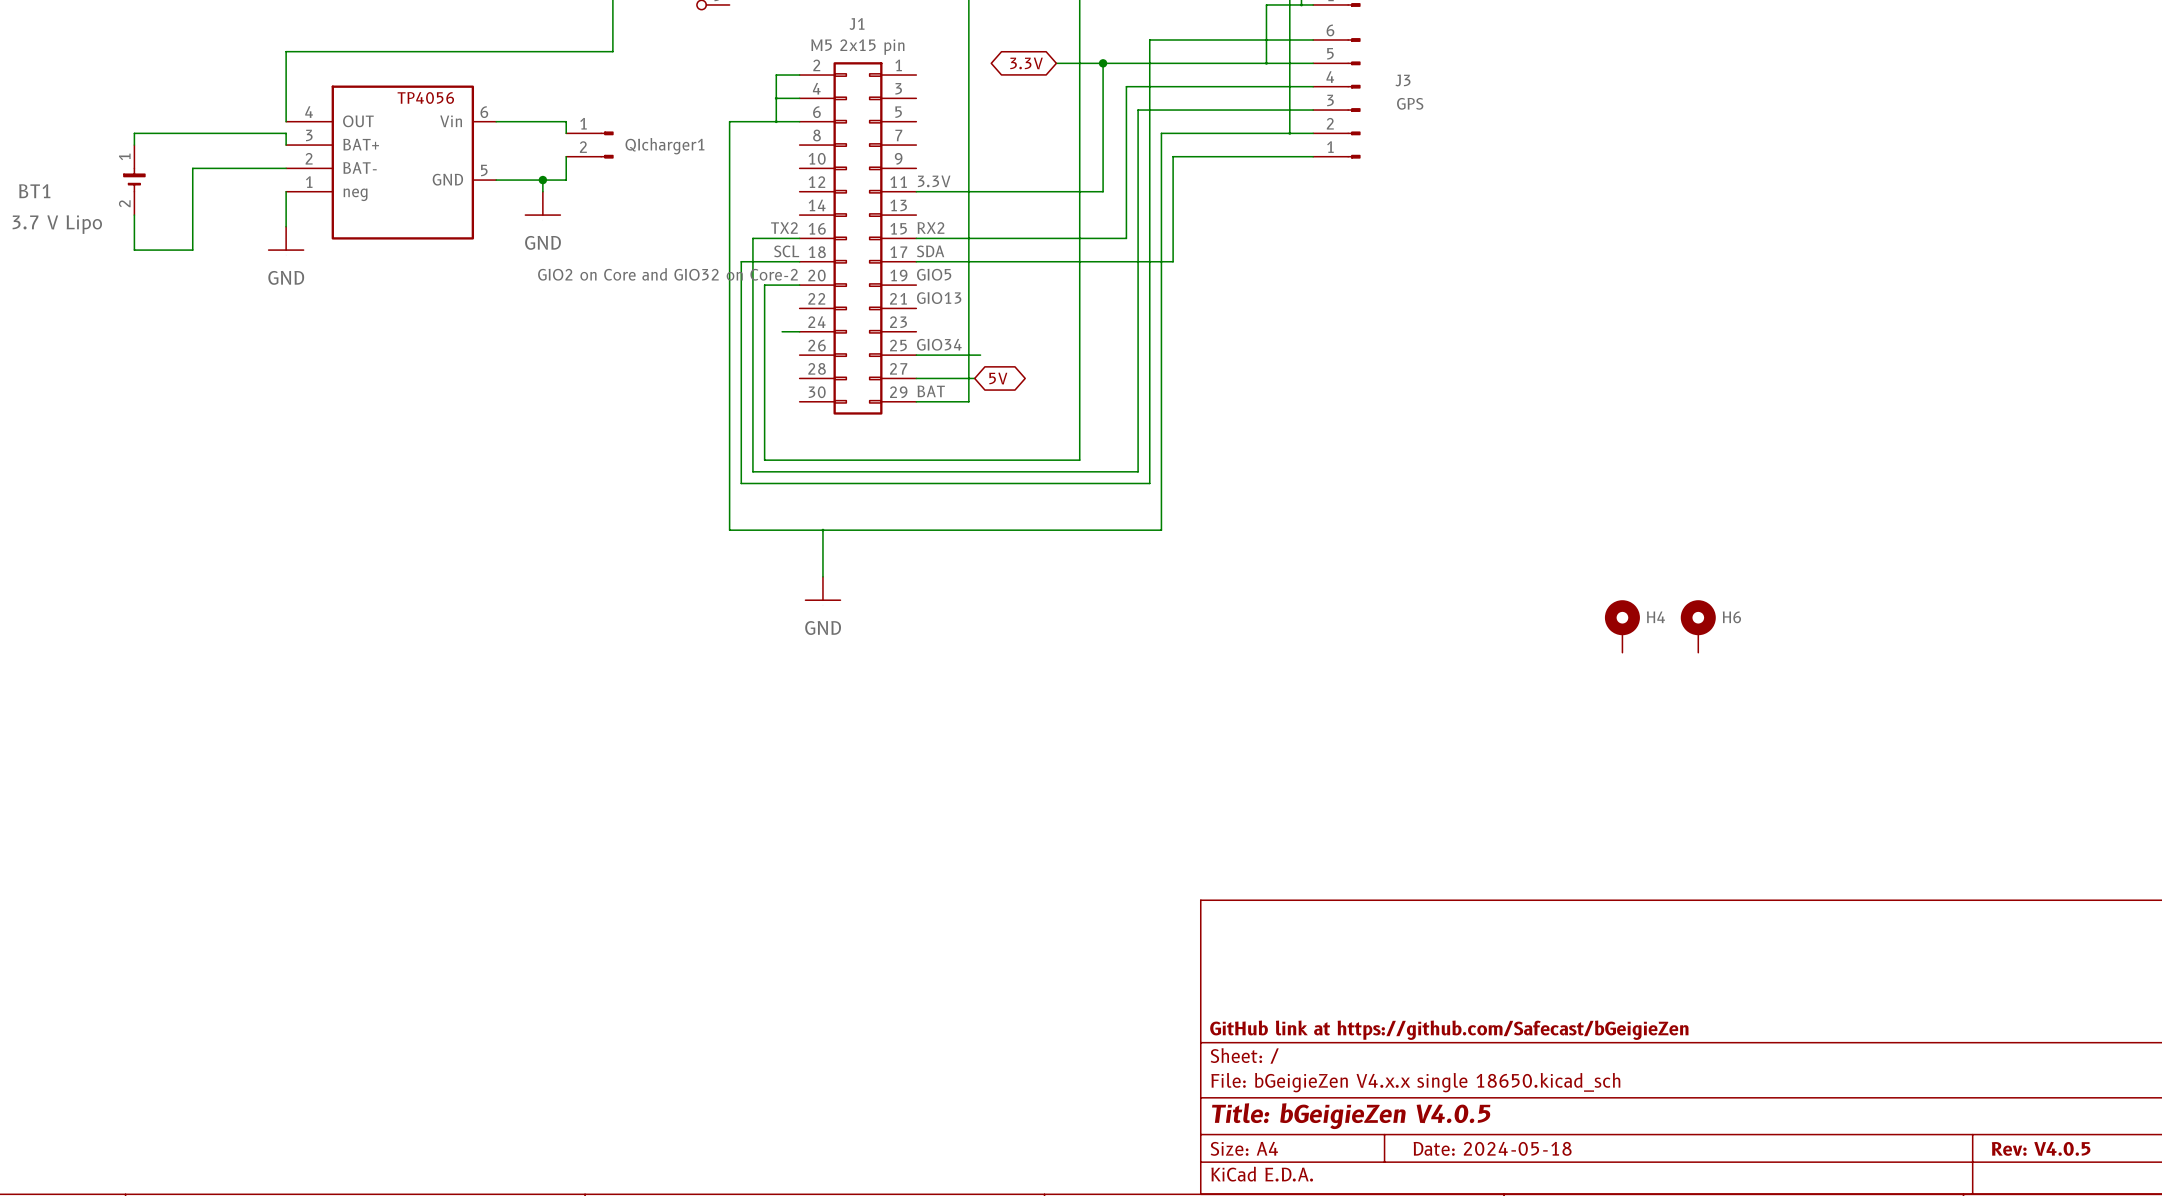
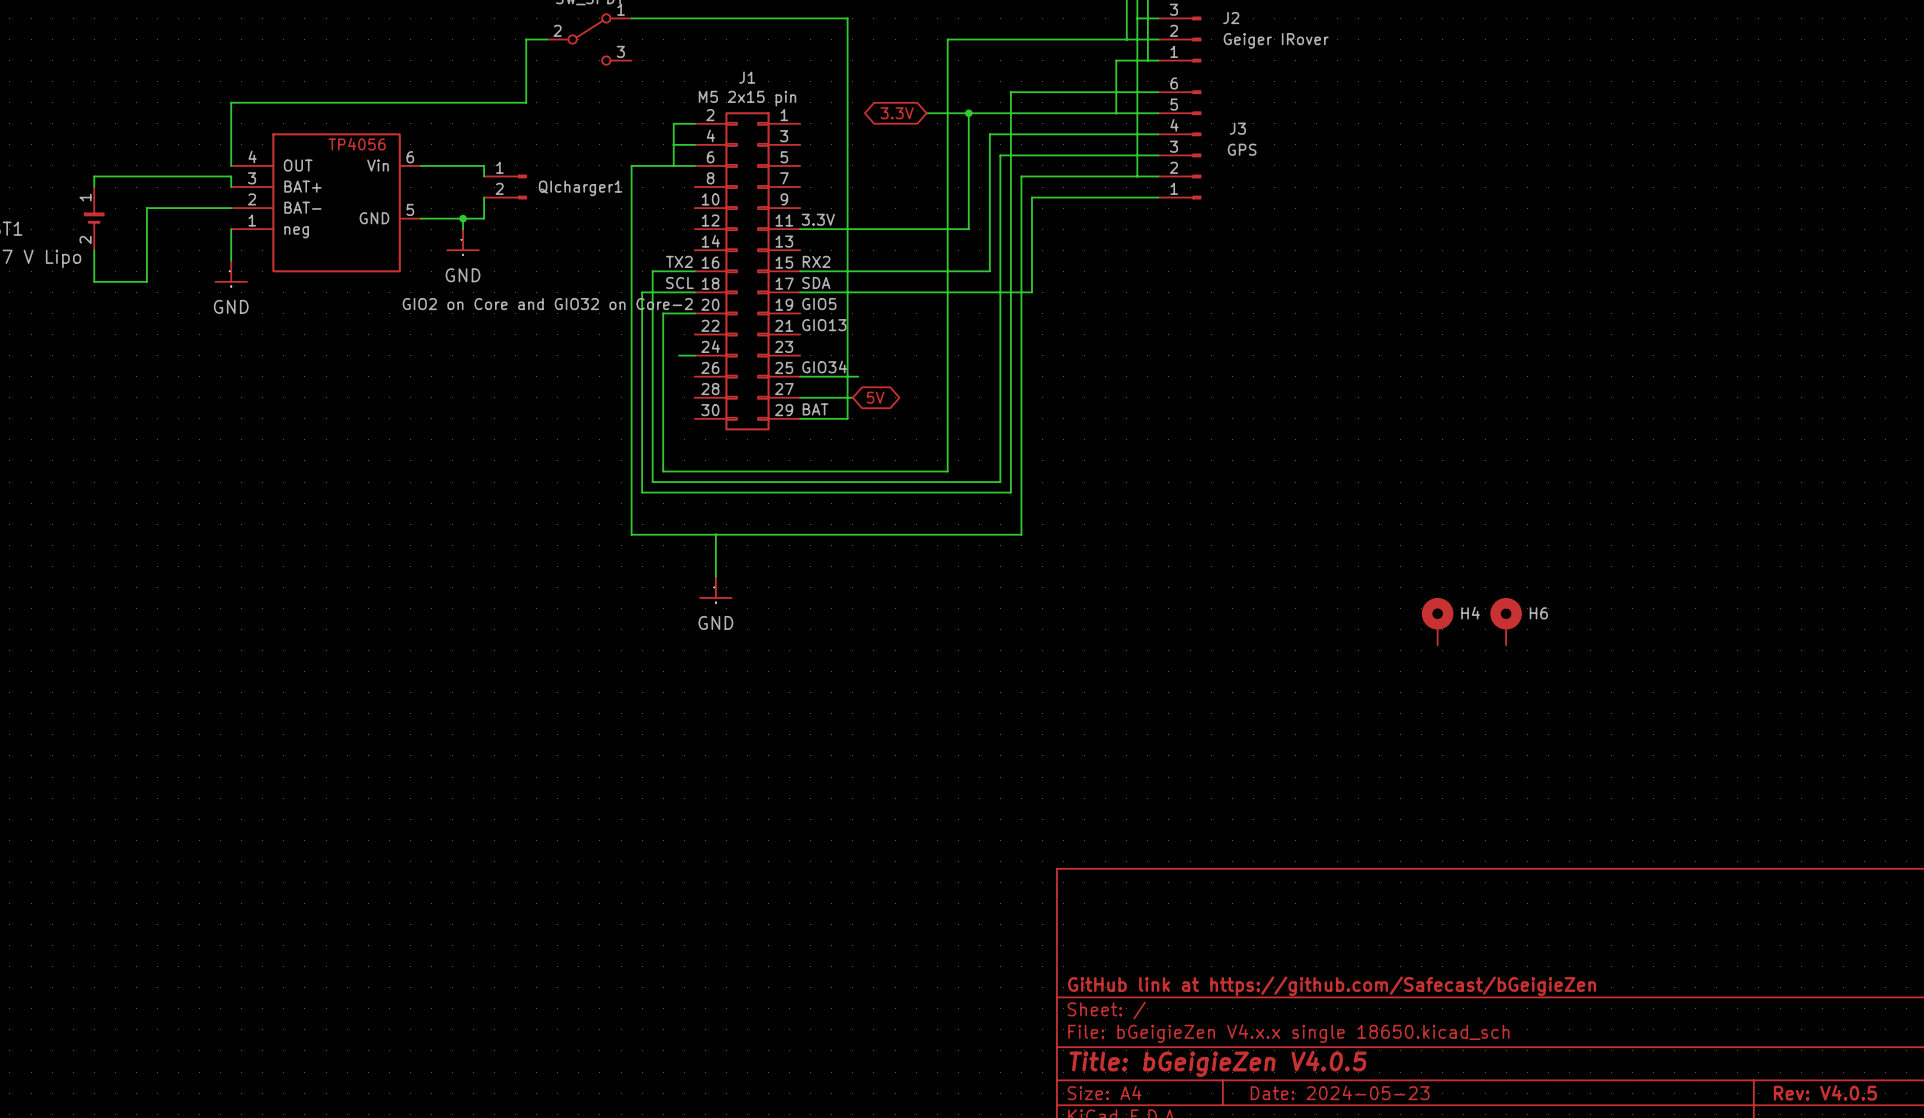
title block: Date: 2024-05-18 (1492, 1148) -> Date: 2024-05-23 (1340, 1092)

